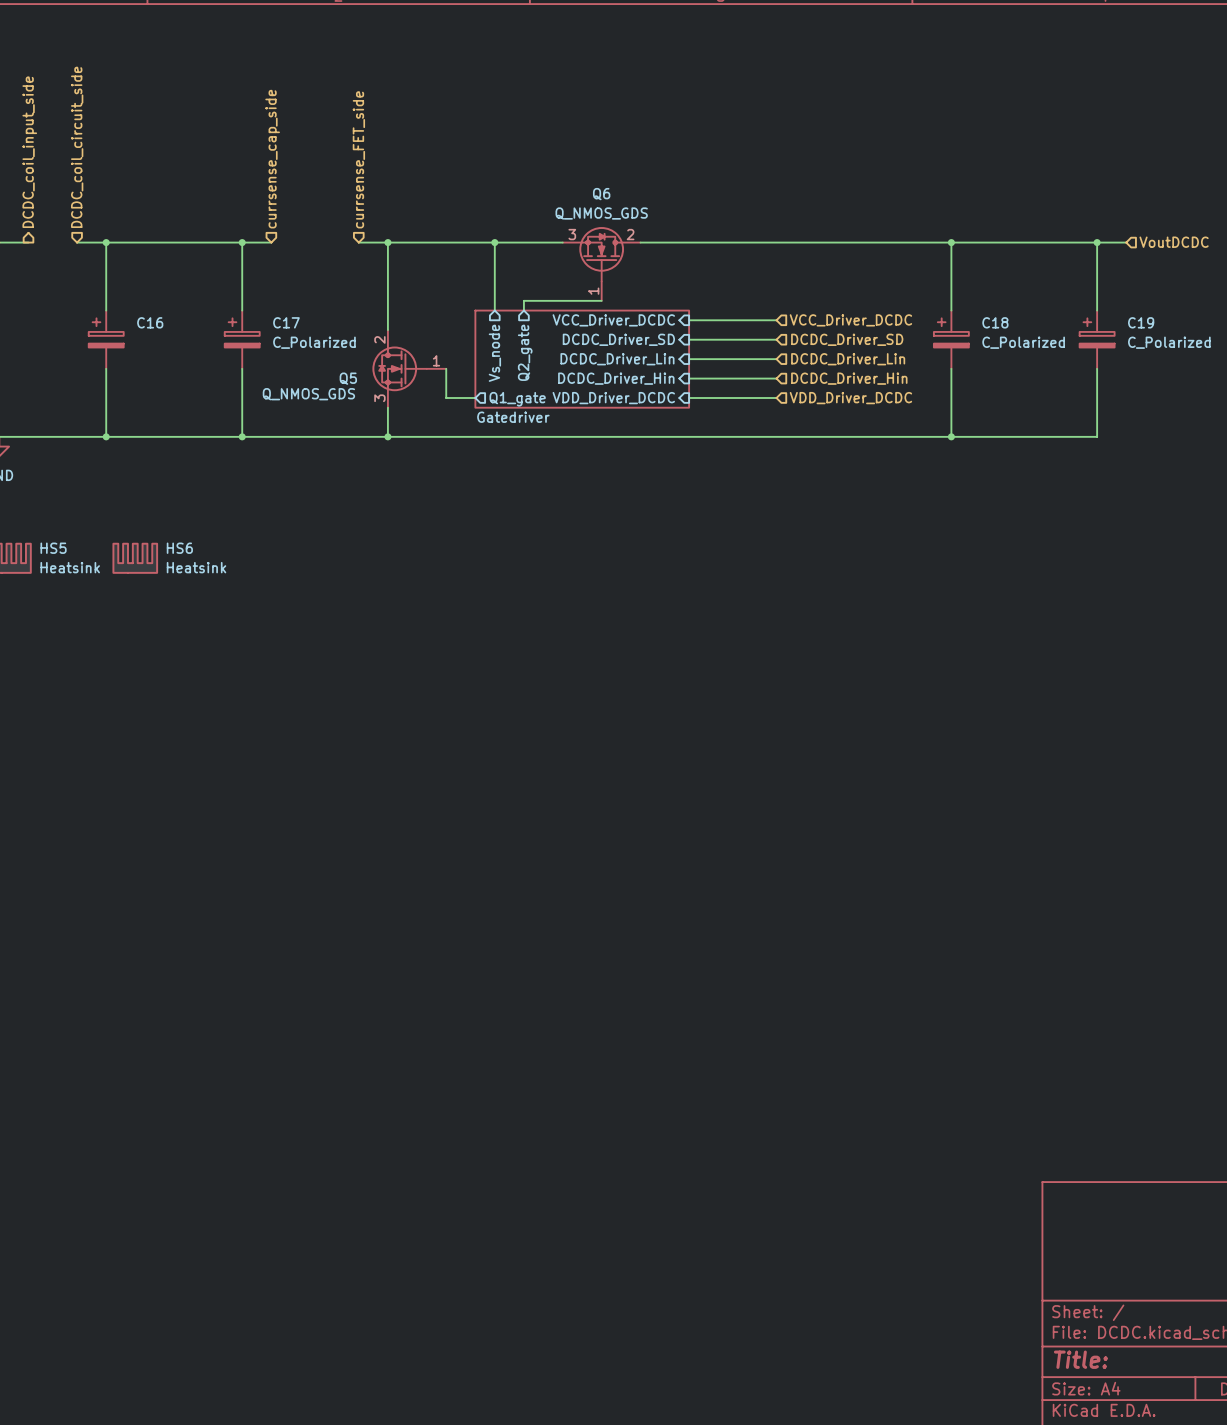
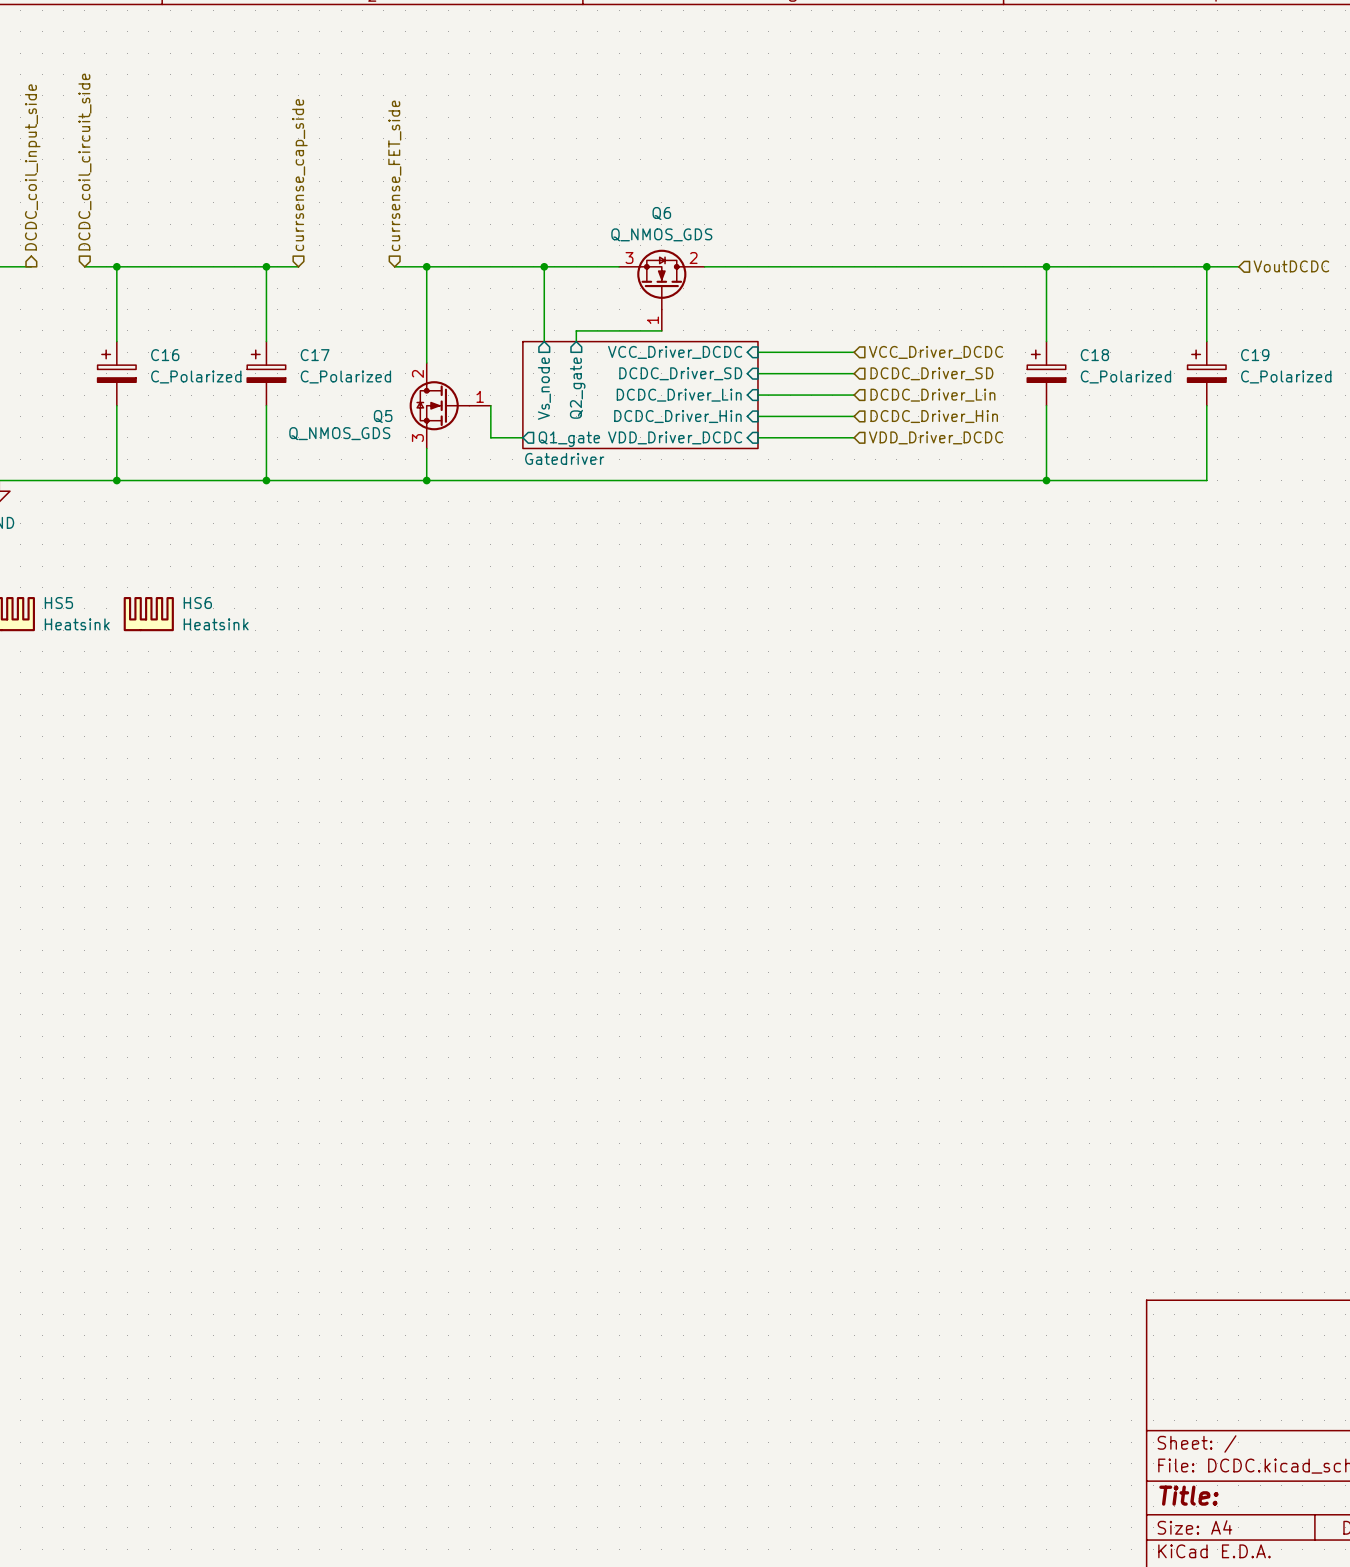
C16 value: none -> C_Polarized (196, 376)

